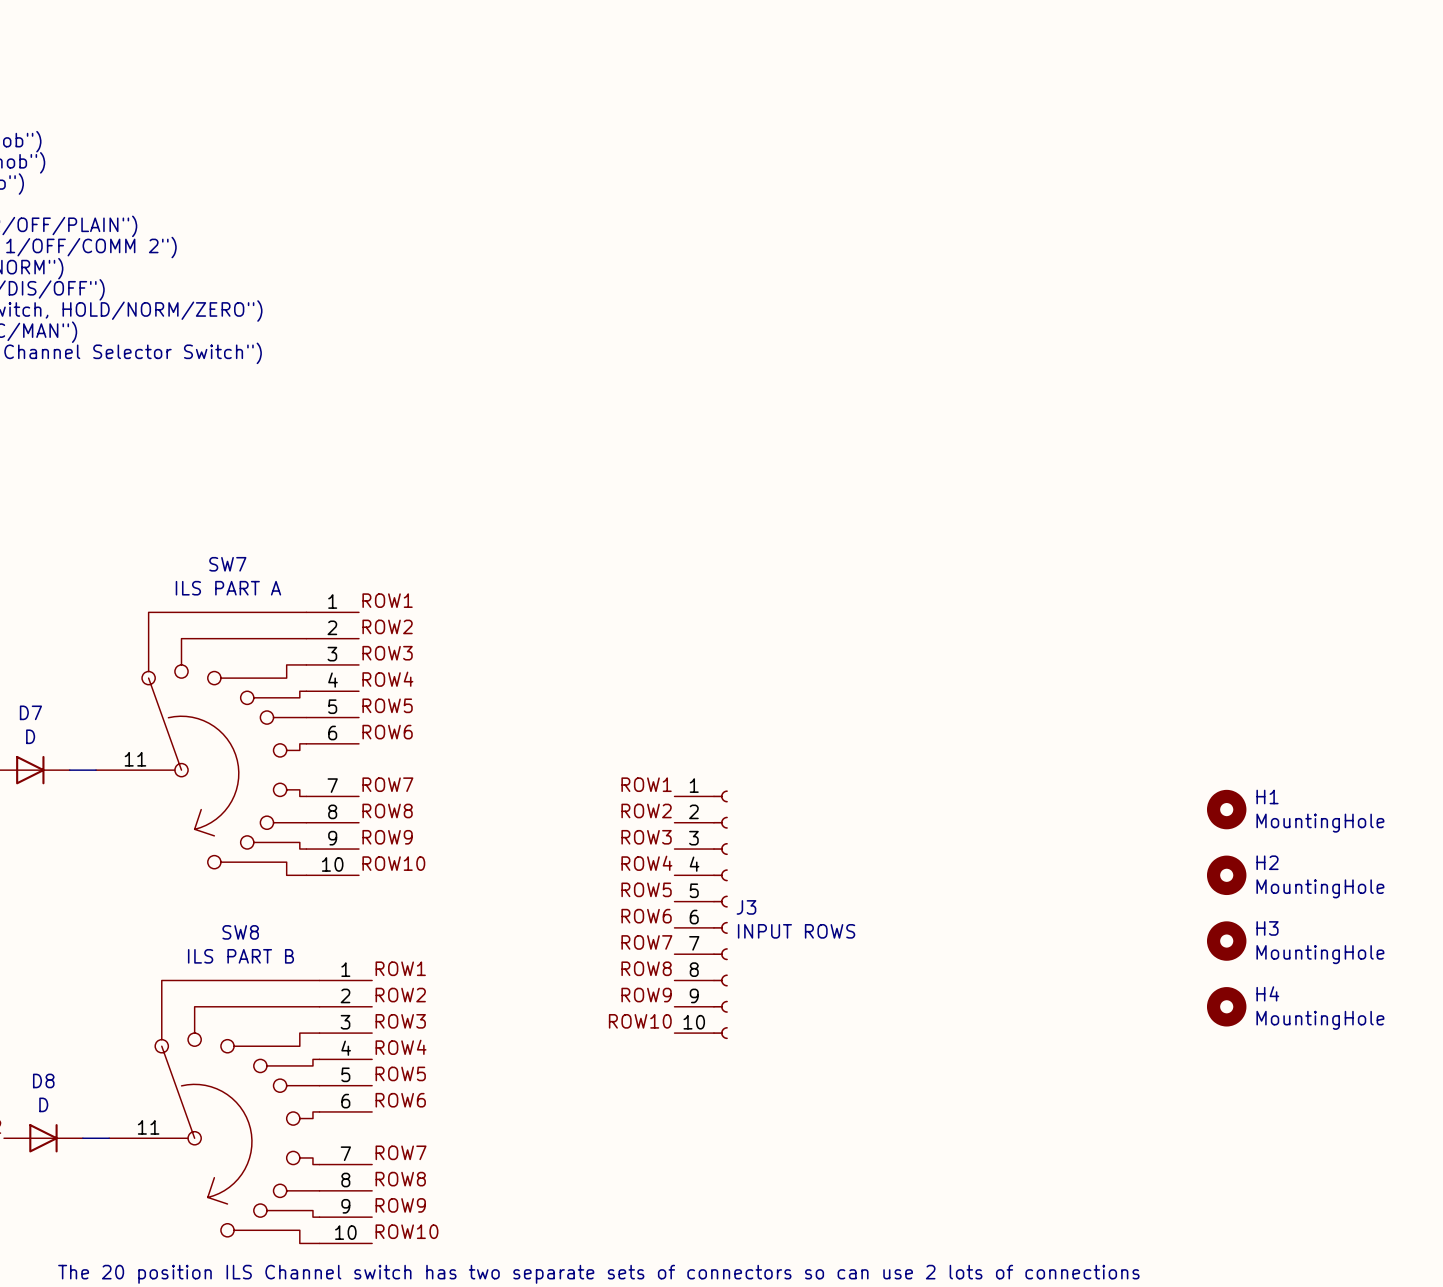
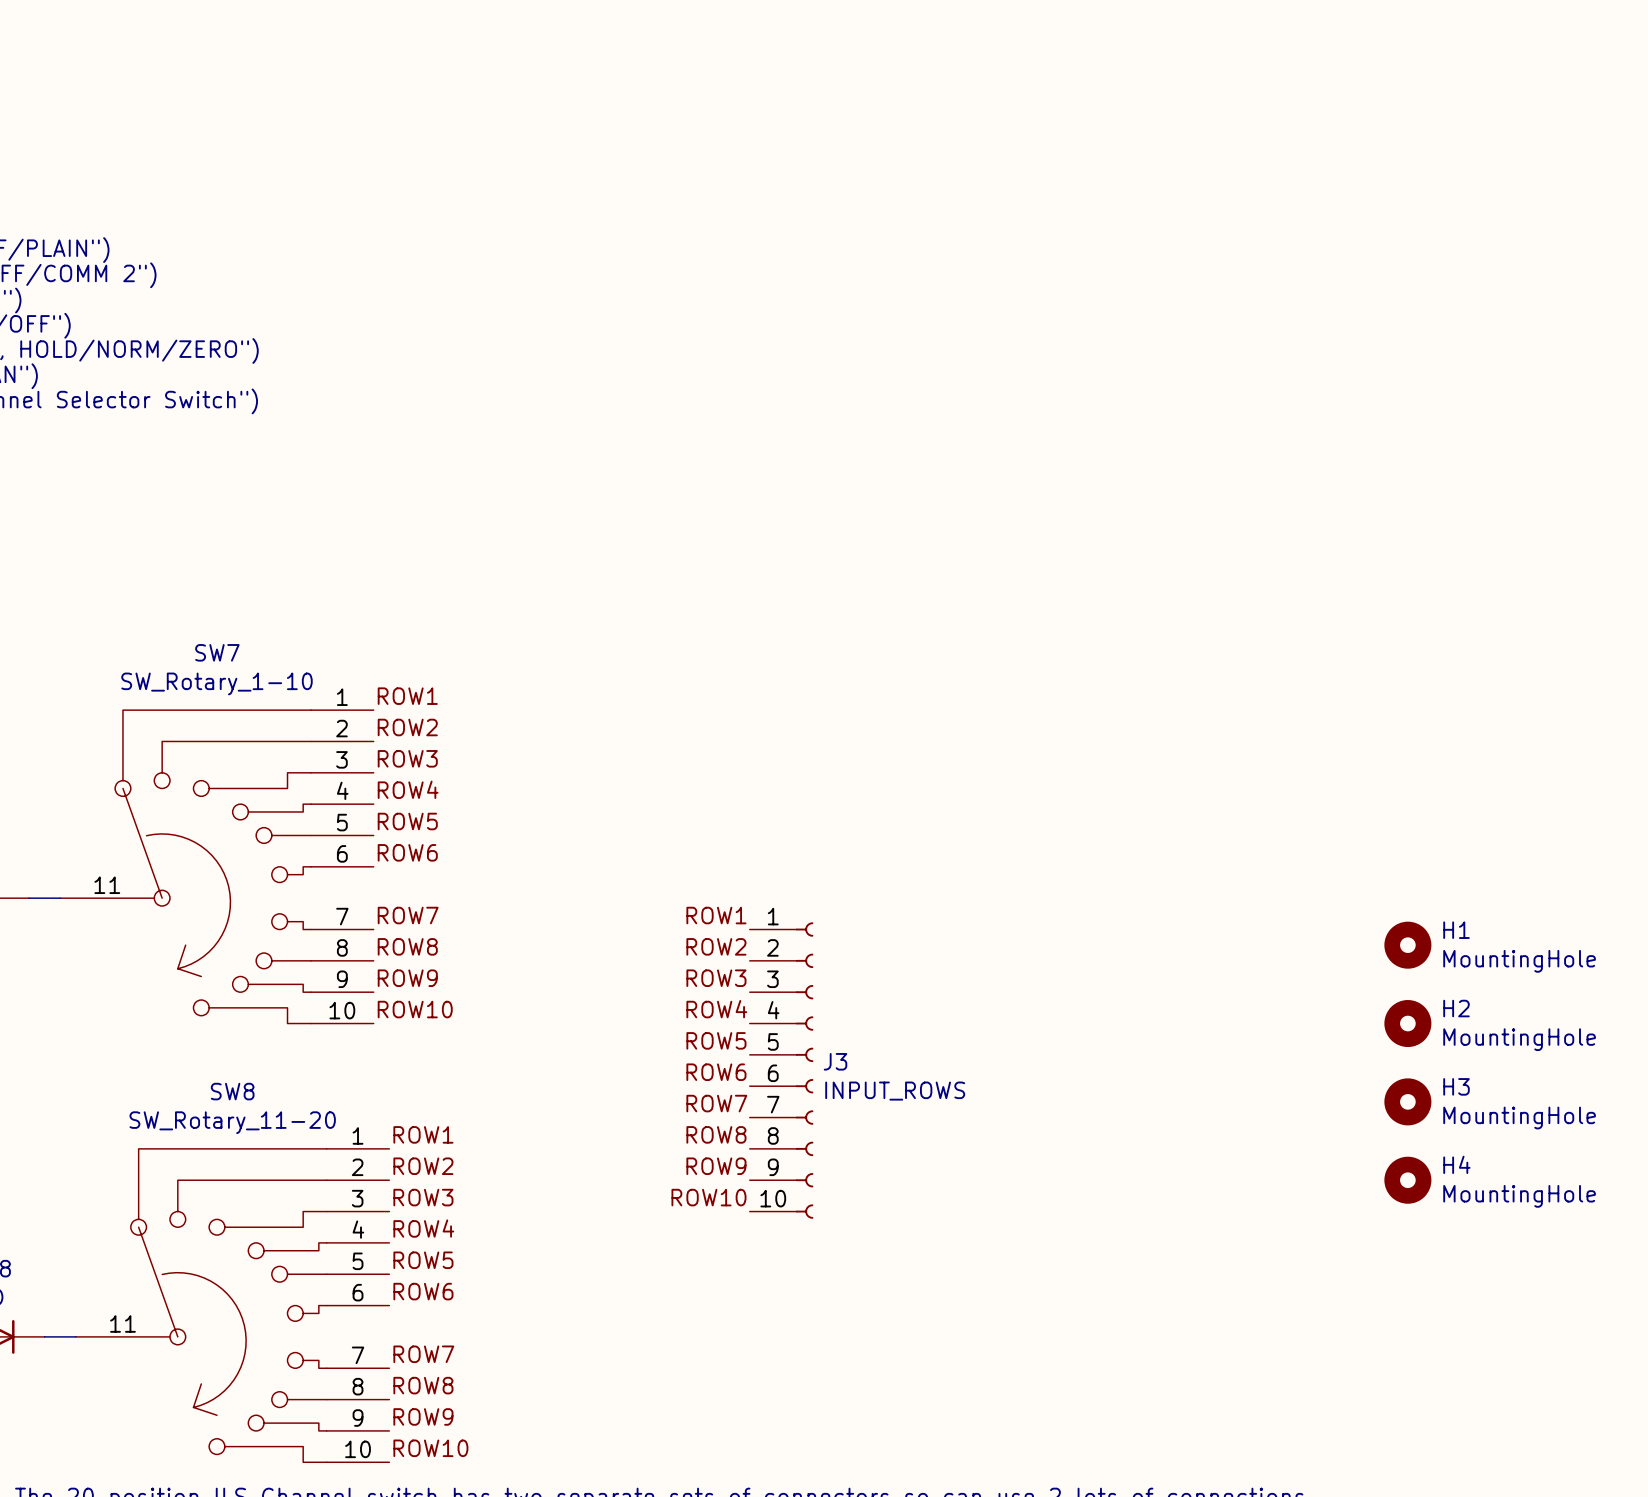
SW7 value: ILS PART A (228, 588) -> SW_Rotary_1-10 (216, 683)
J3 value: INPUT ROWS (796, 931) -> INPUT_ROWS (895, 1091)
SW8 value: ILS PART B (240, 956) -> SW_Rotary_11-20 (232, 1122)

